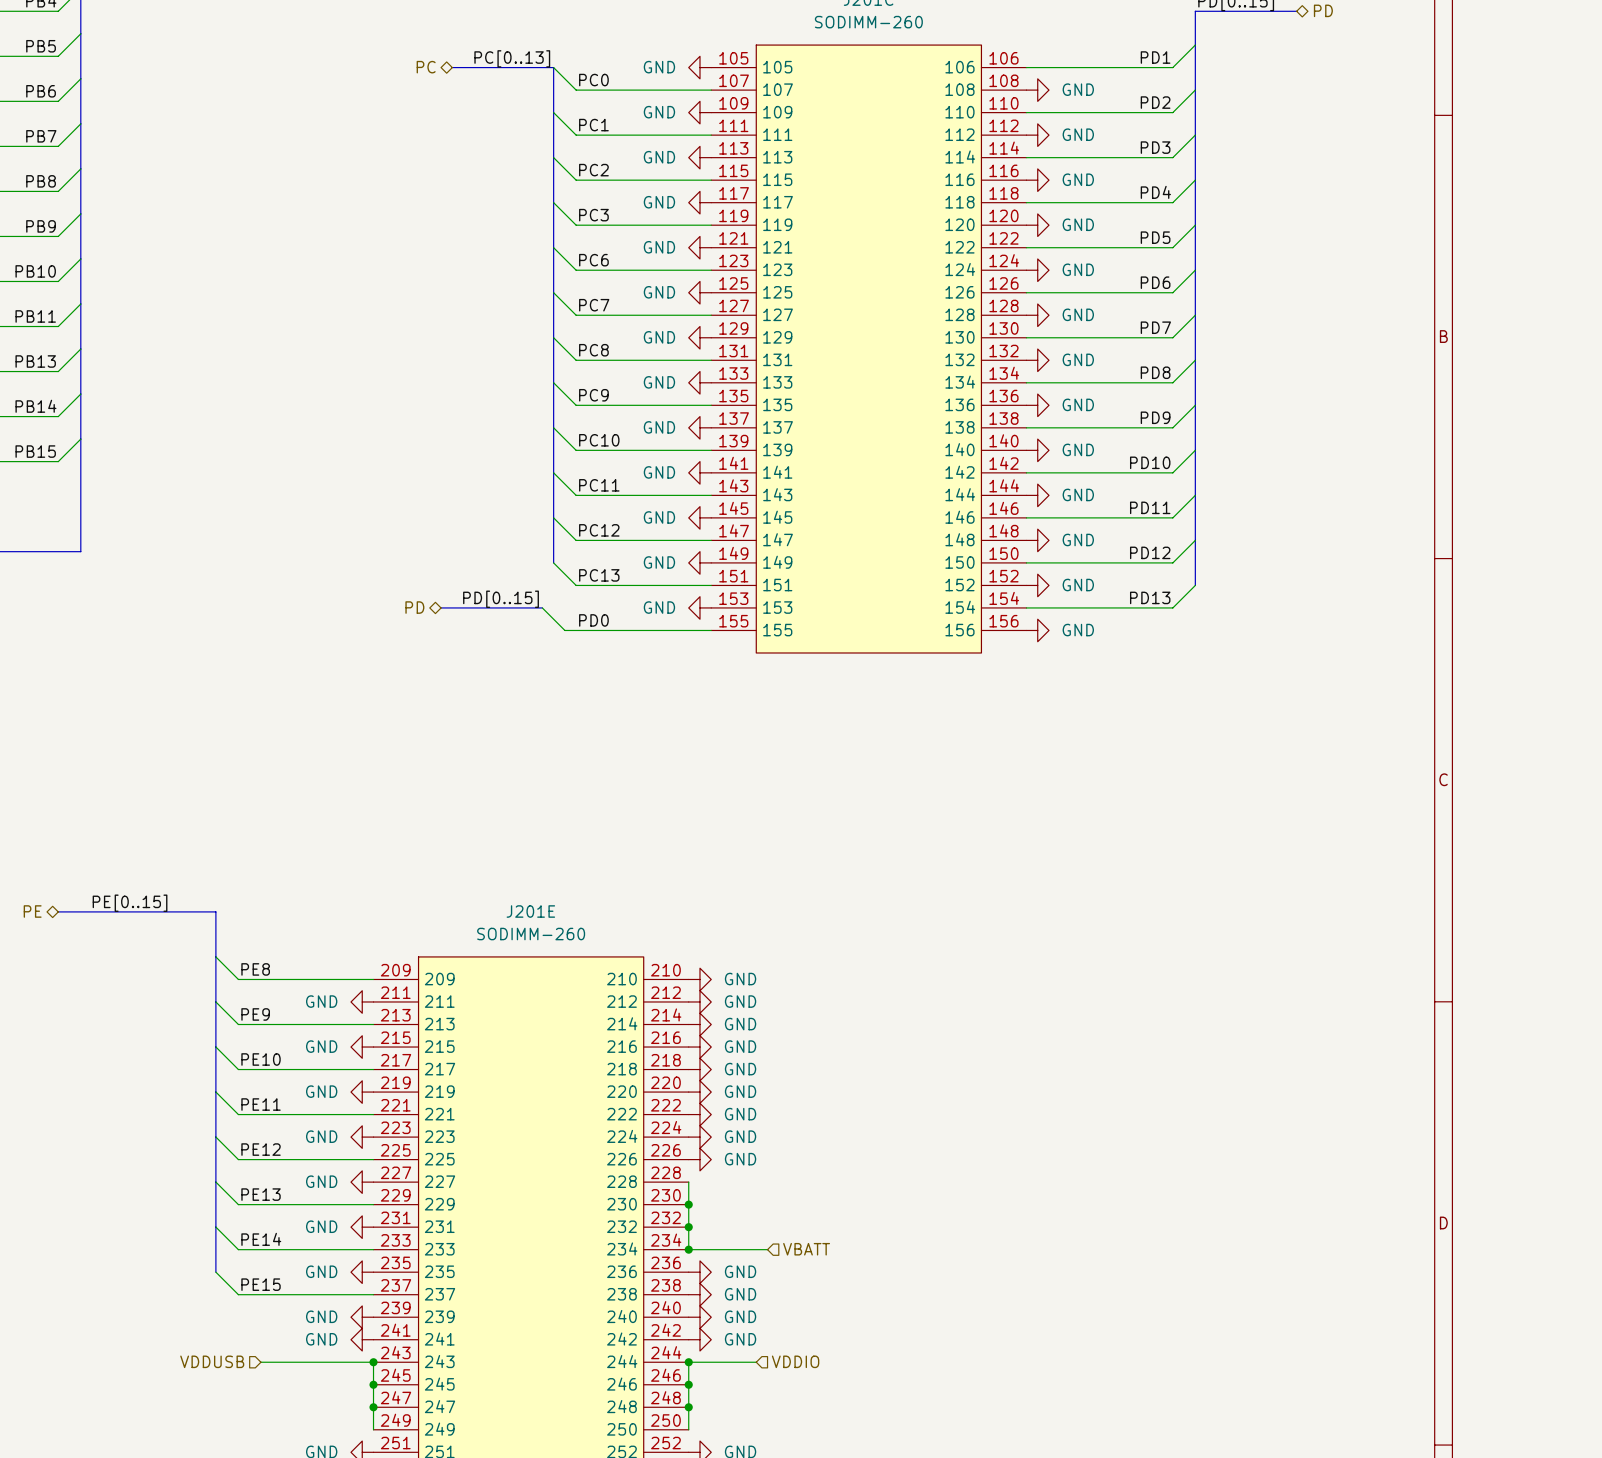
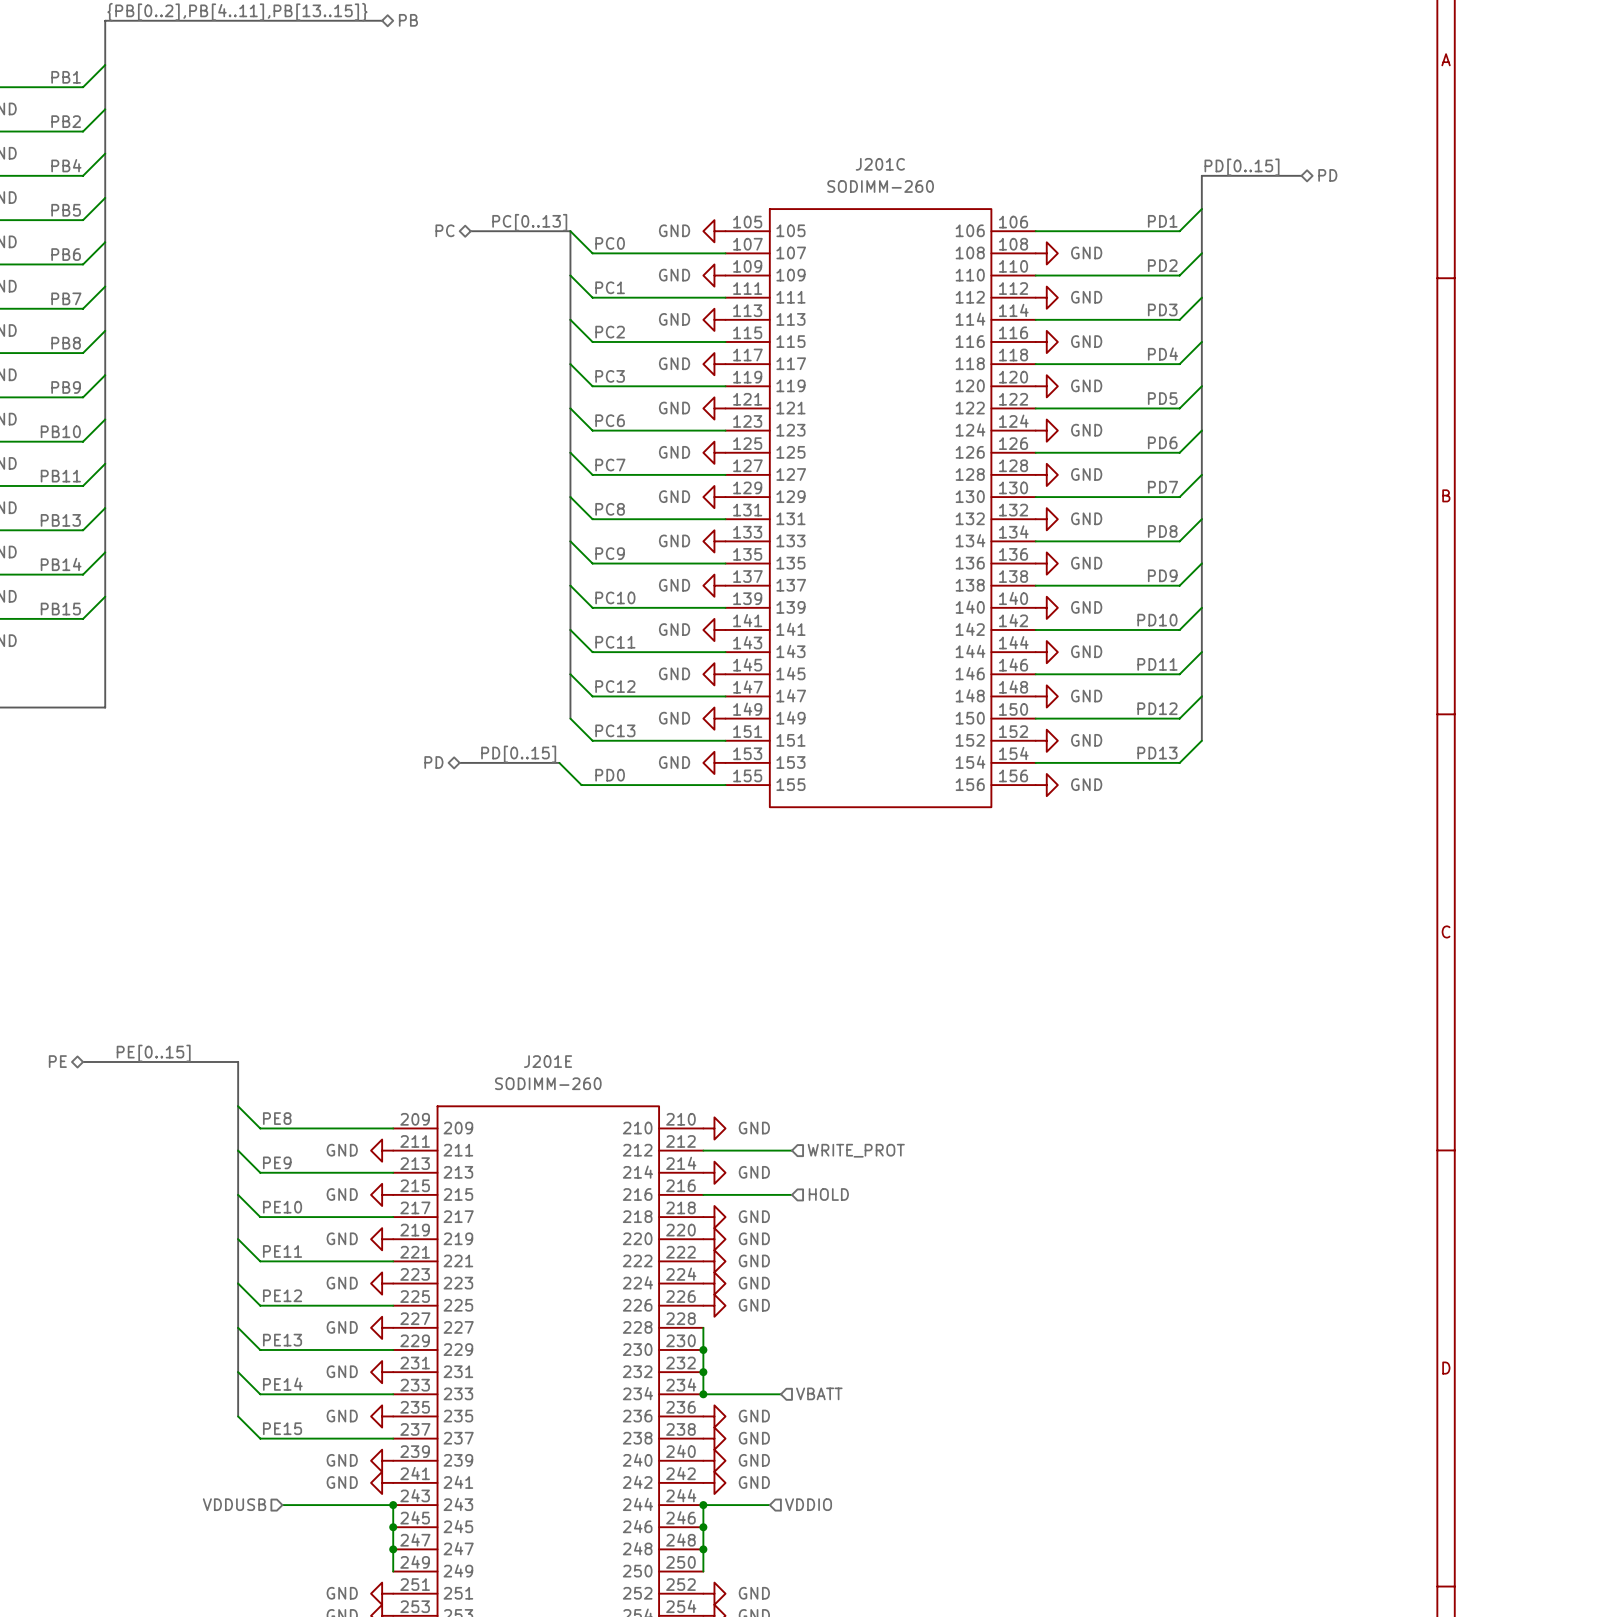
wire: none -> (703, 1150) (791, 1150)
power symbol: GND (699, 1001) -> none
hierarchical label: none -> WRITE_PROT (856, 1150)
hierarchical label: none -> HOLD (828, 1194)
wire: none -> (703, 1194) (791, 1194)
power symbol: GND (699, 1047) -> none

